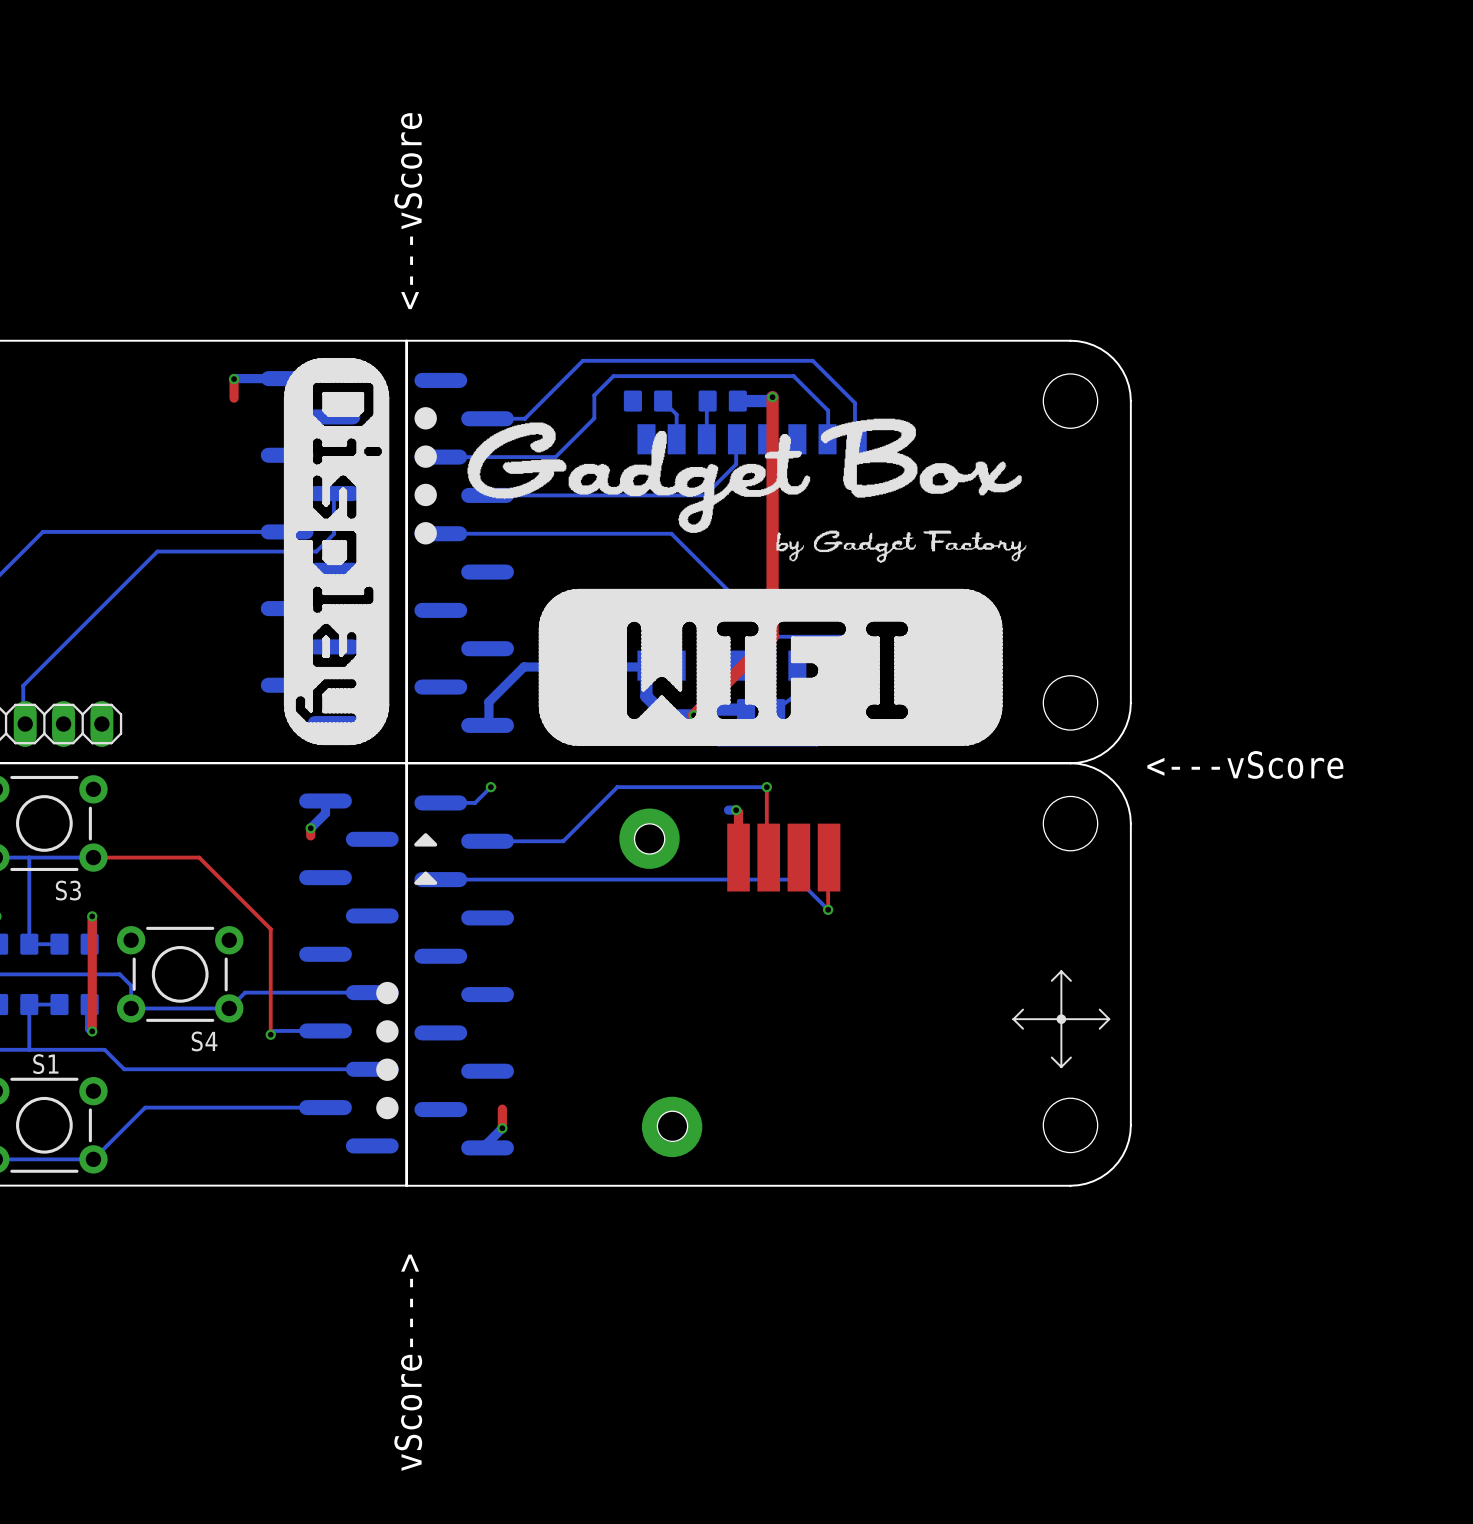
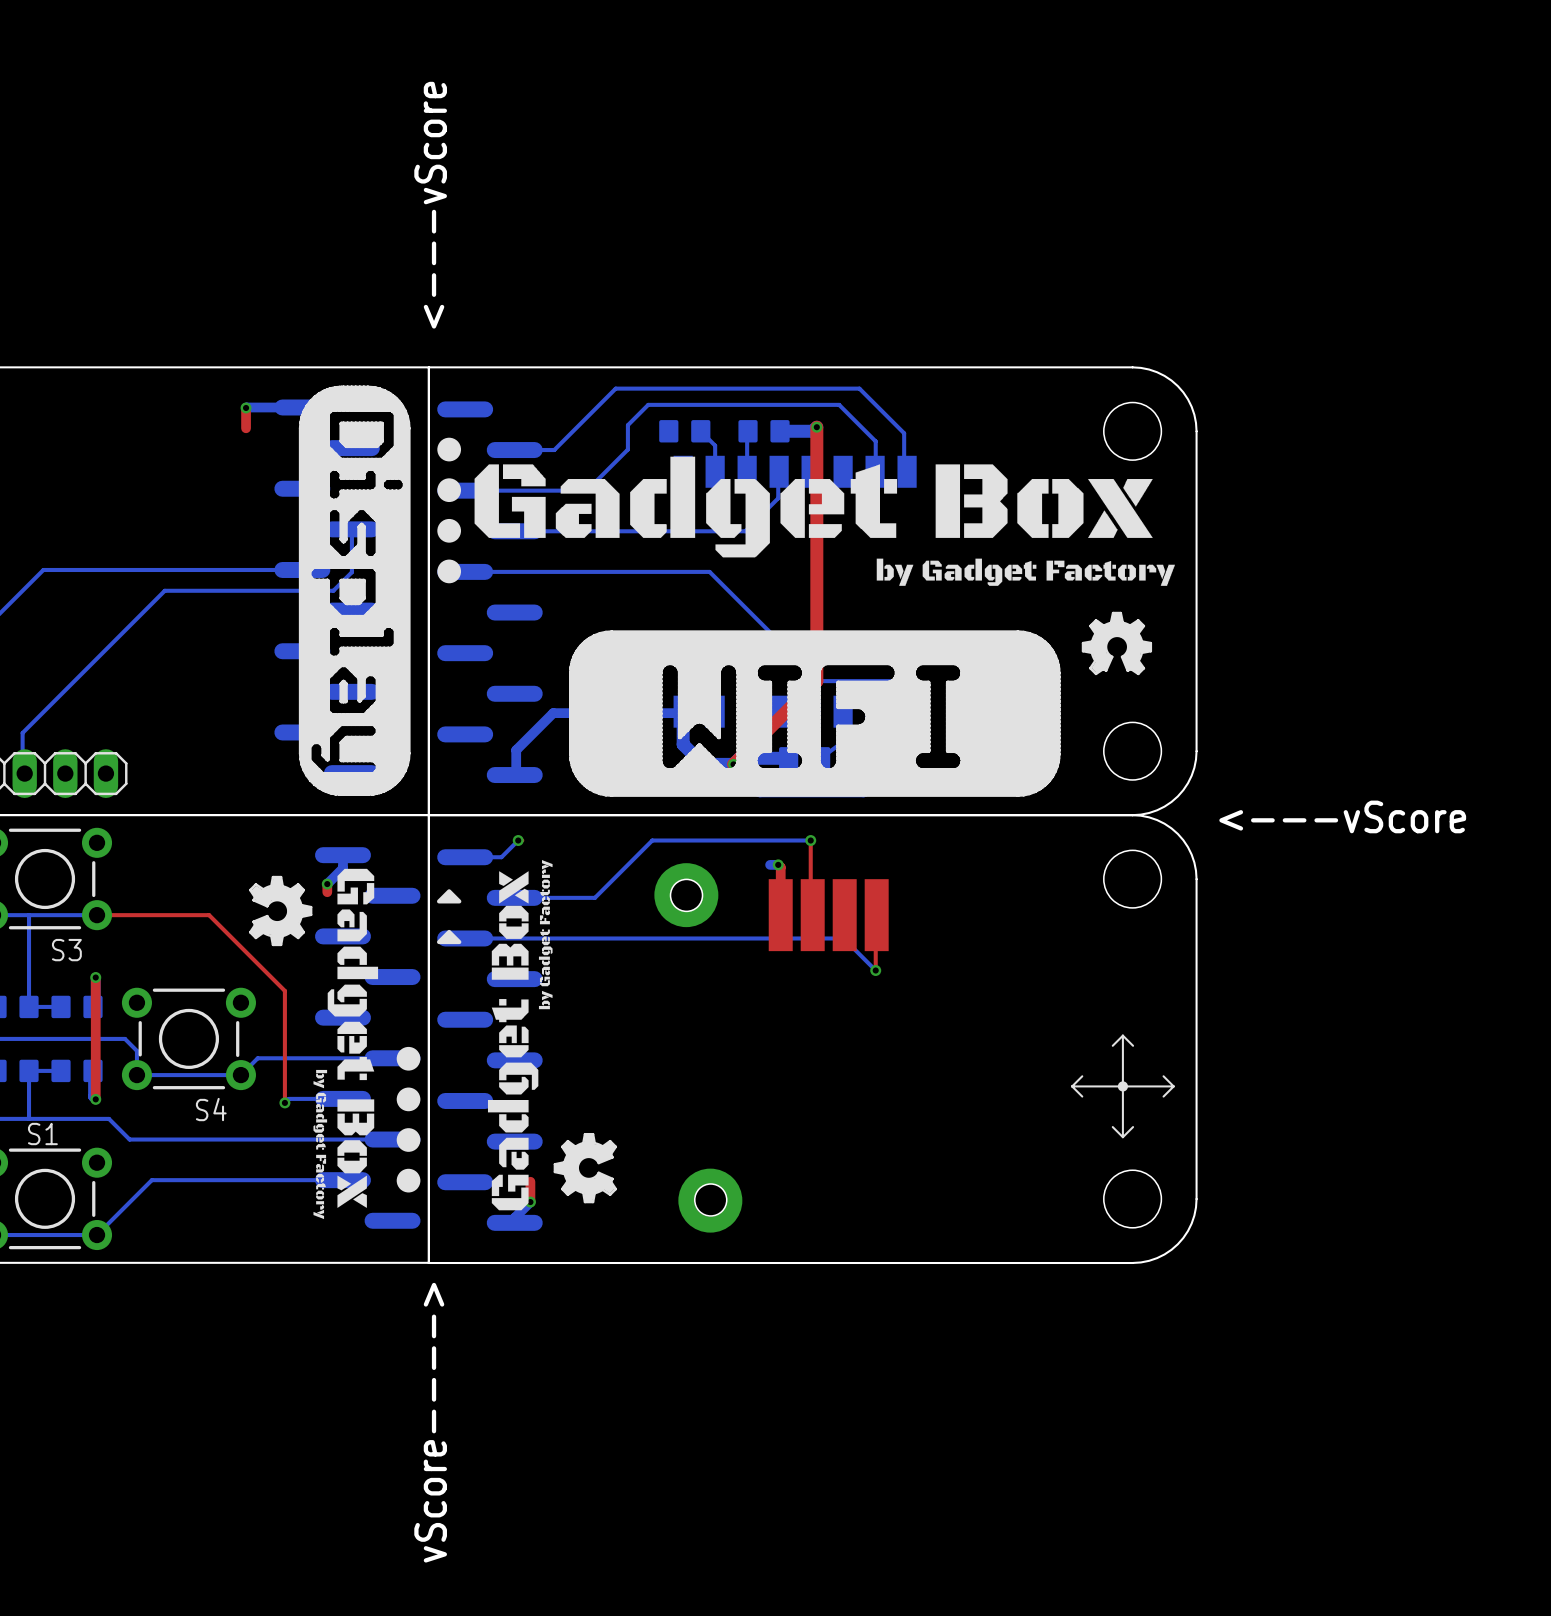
drawing: [467, 418, 1027, 563] -> none
drawing: none -> [474, 456, 1175, 586]
drawing: none -> [1081, 611, 1153, 676]
drawing: none -> [487, 860, 618, 1211]
drawing: none -> [248, 868, 379, 1220]

